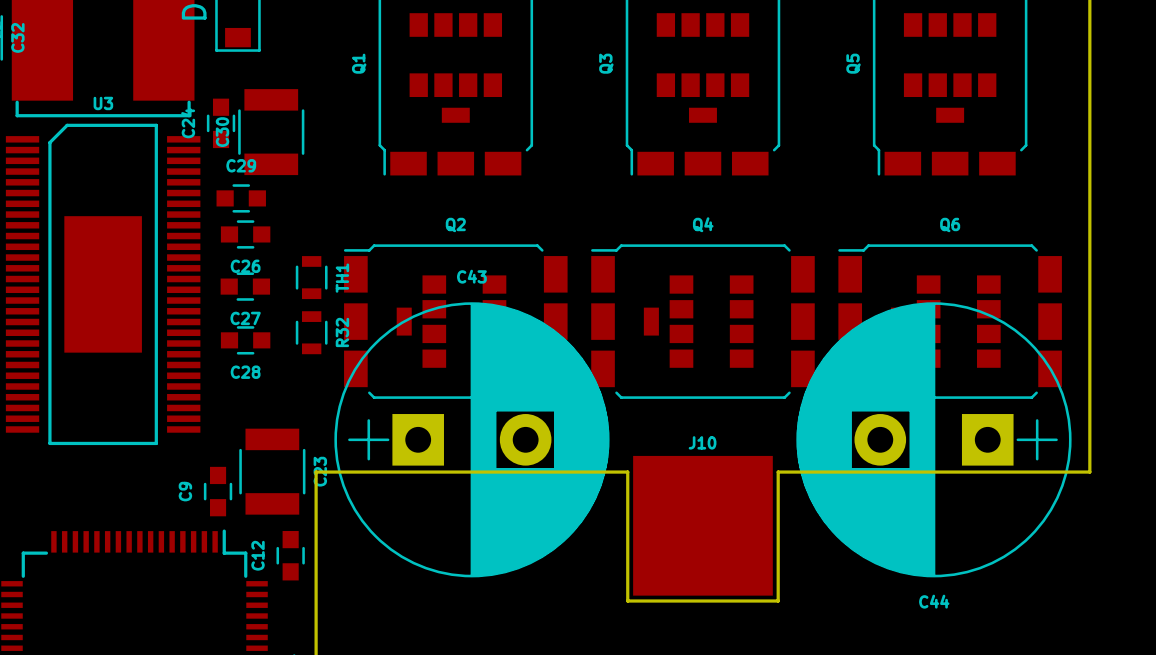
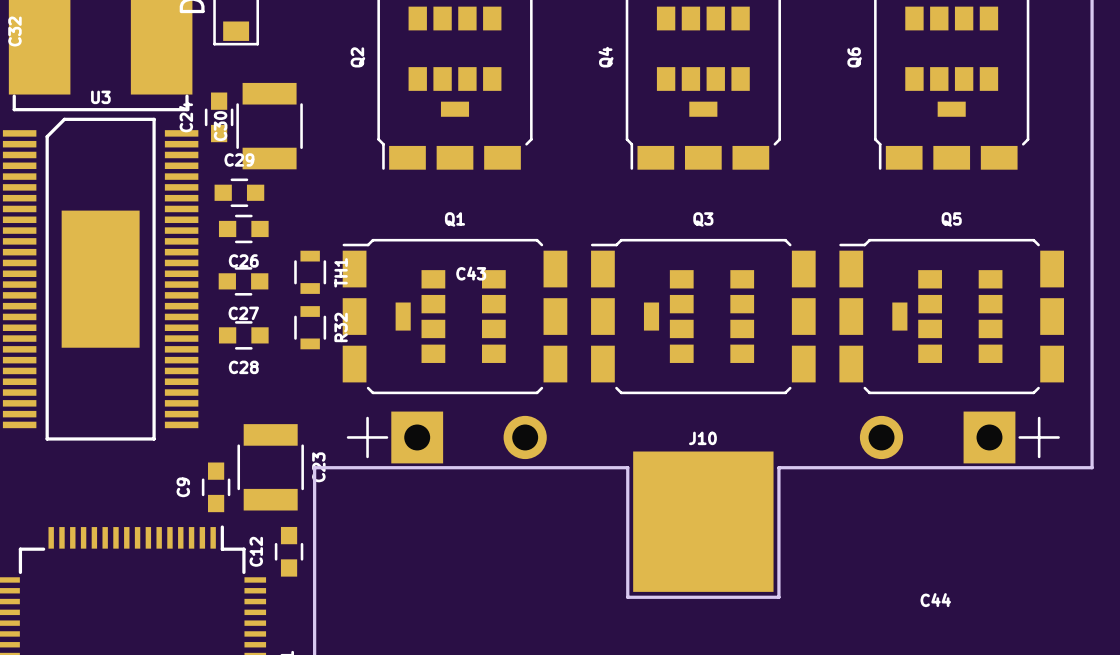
Q1 name: Q1 (359, 63) -> Q2 (357, 57)
Q3 name: Q3 (606, 63) -> Q4 (606, 57)
Q5 name: Q5 (853, 63) -> Q6 (854, 57)
Q2 name: Q2 (455, 224) -> Q1 (455, 219)
Q4 name: Q4 (703, 224) -> Q3 (703, 219)
Q6 name: Q6 (950, 224) -> Q5 (951, 219)
C43 footprint: [334, 302, 610, 578] -> [346, 411, 547, 464]
C44 footprint: [796, 302, 1072, 578] -> [859, 411, 1060, 464]

